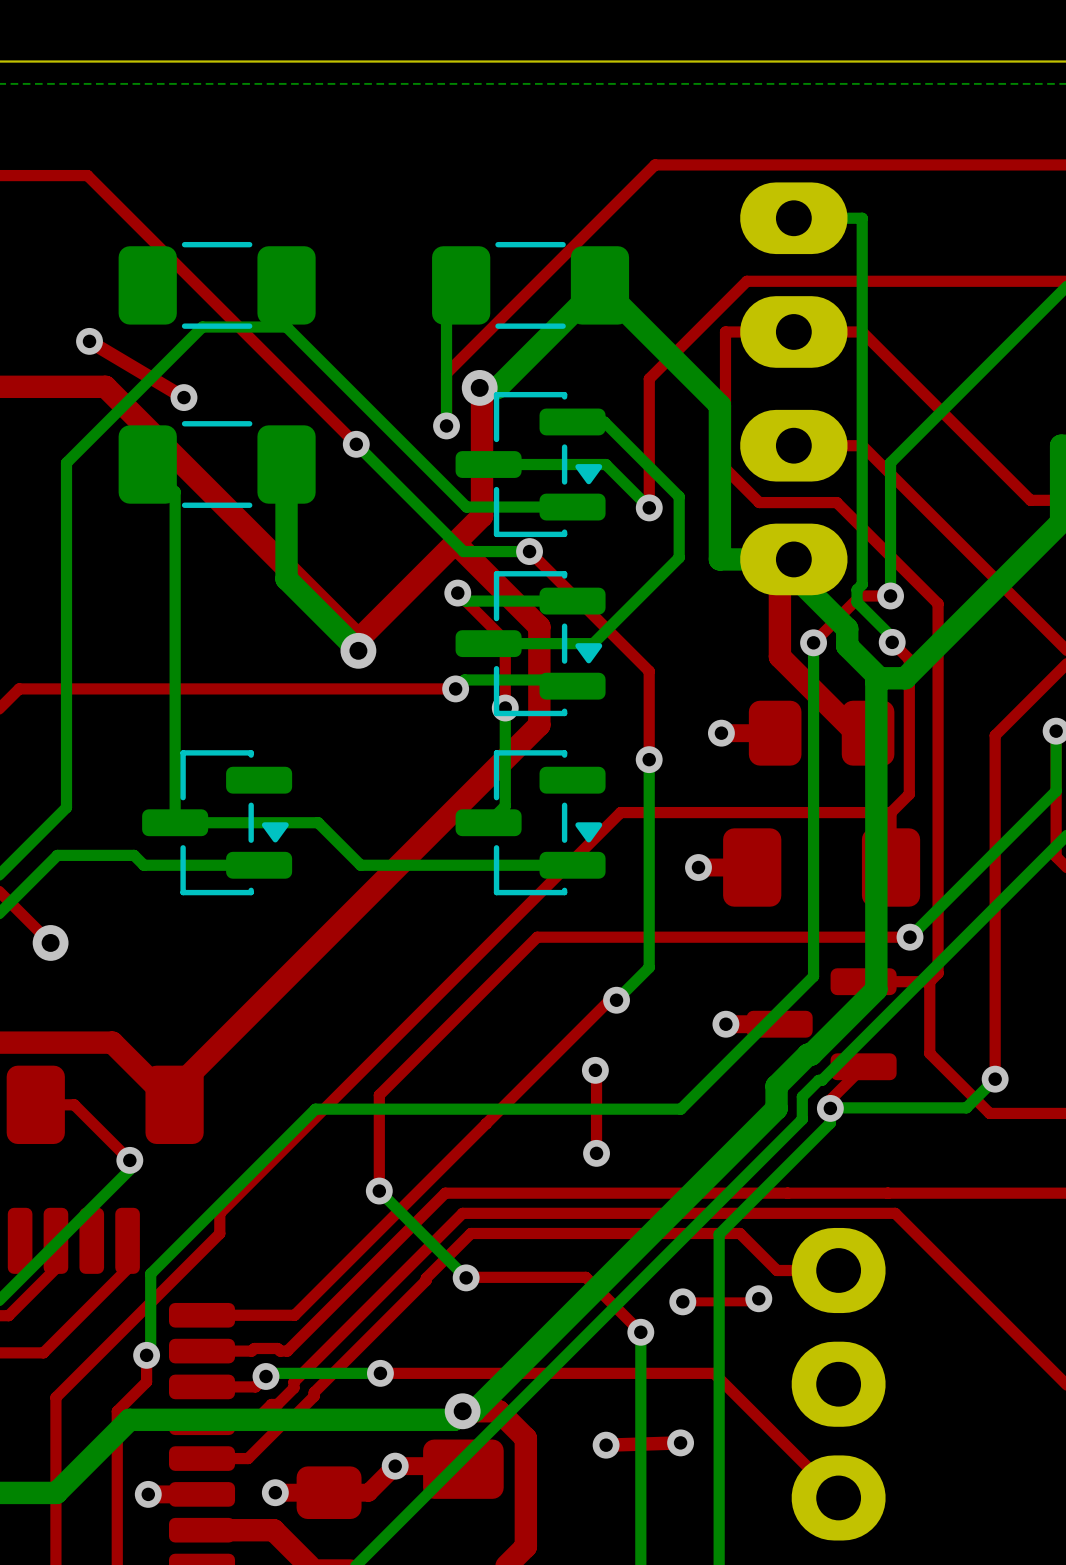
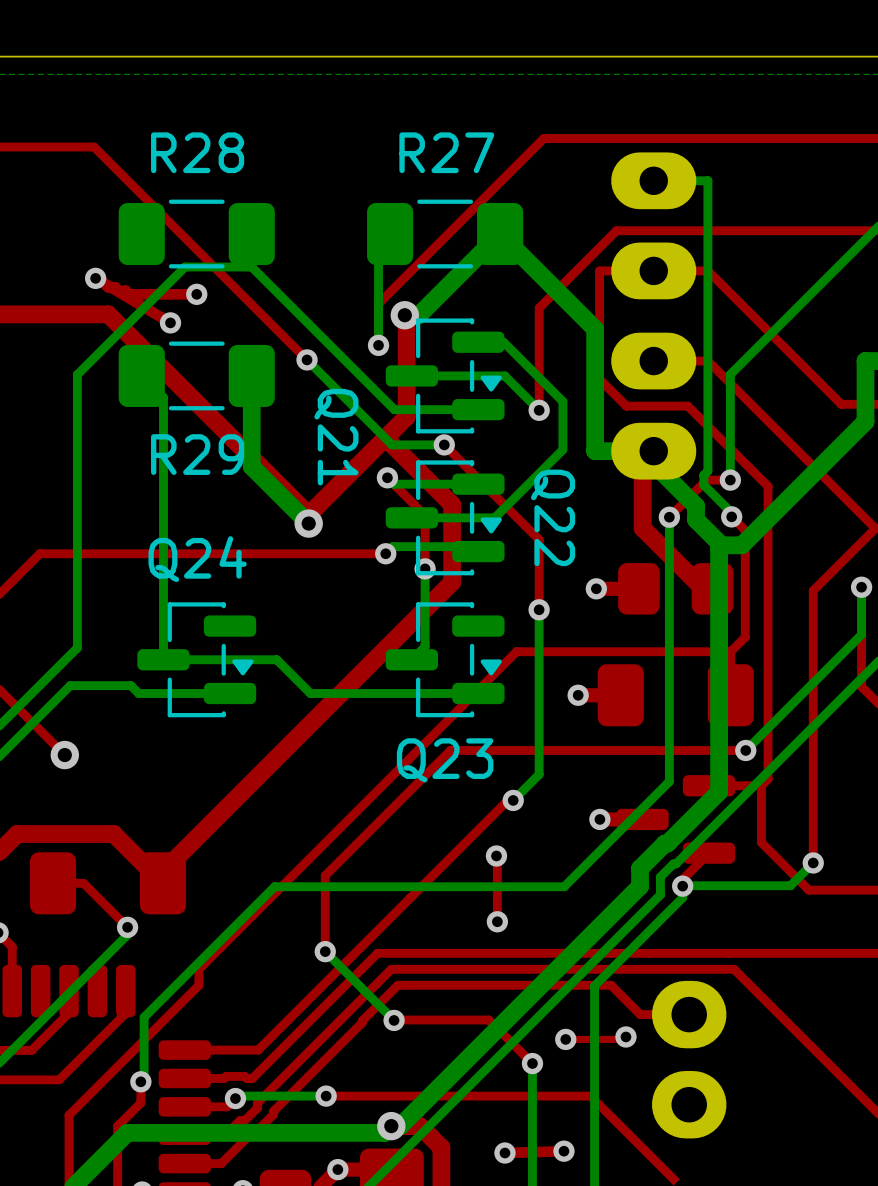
R28 name: none -> R28 (197, 152)
R27 name: none -> R27 (446, 152)
top track: none -> (97, 276) (108, 287) (125, 290) (129, 294) (196, 294)
via: none -> (196, 294)
Q21 name: none -> Q21 (336, 437)
R29 name: none -> R29 (197, 454)
Q22 name: none -> Q22 (553, 517)
Q24 name: none -> Q24 (197, 559)
Q23 name: none -> Q23 (445, 760)

